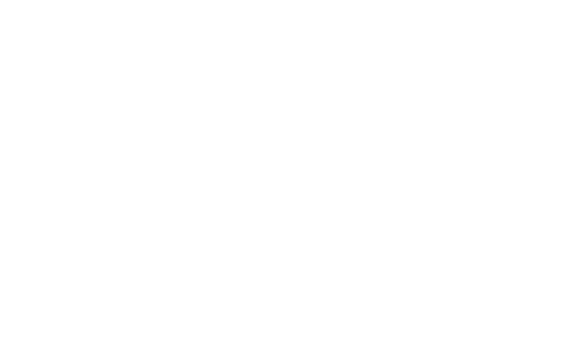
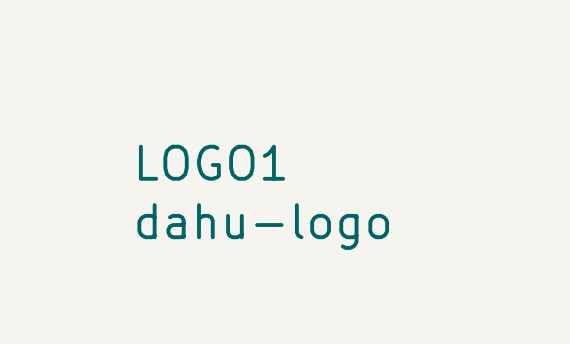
LOGO1: none -> dahu-logo (263, 197)

